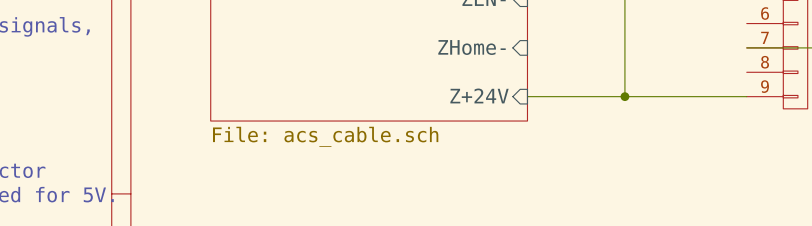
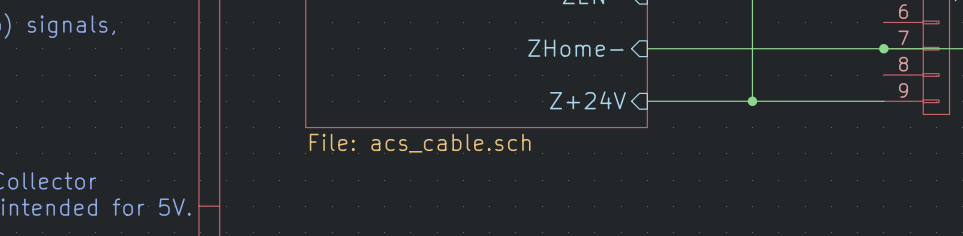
wire: none -> (647, 48) (883, 48)
junction: none -> (883, 48)

